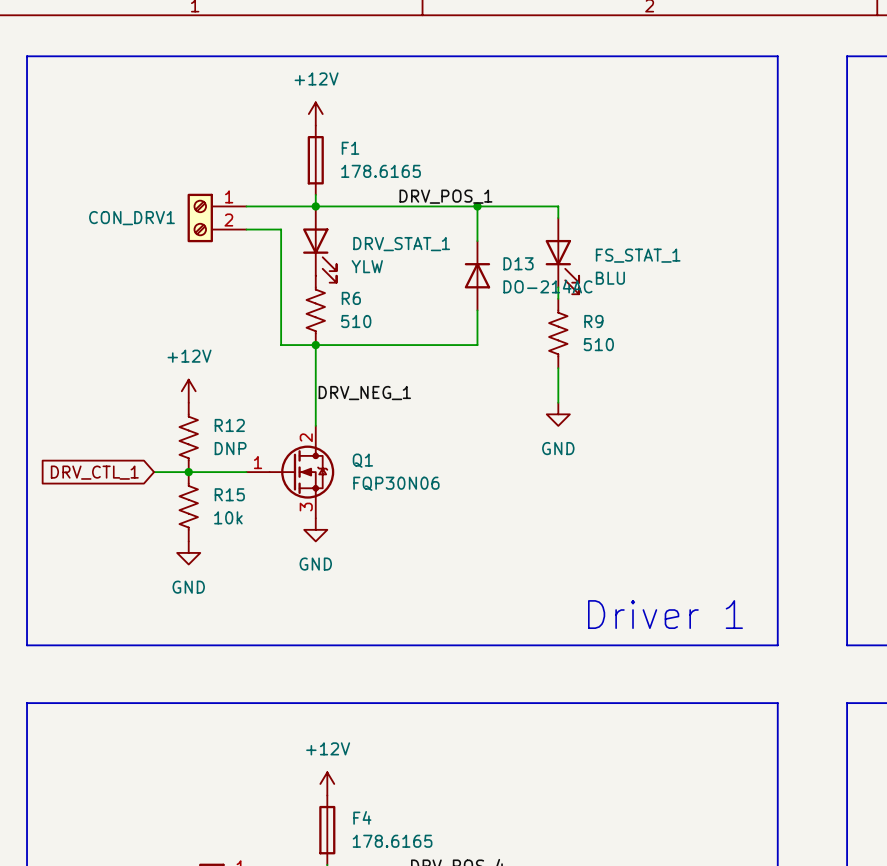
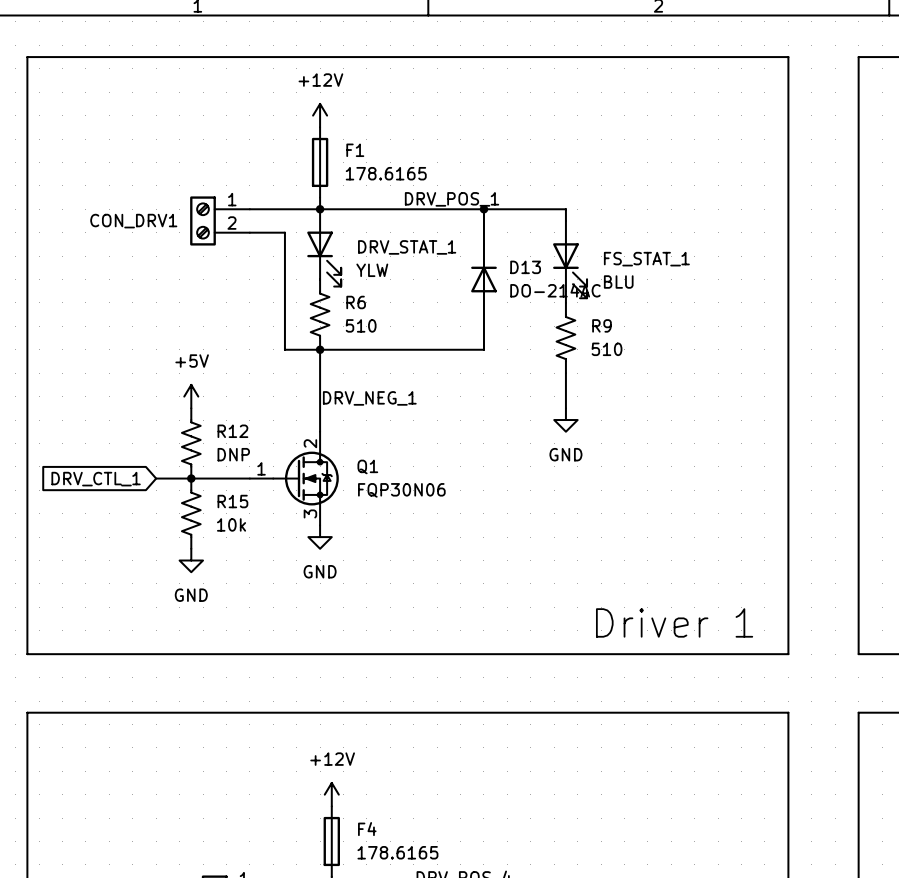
power symbol: +12V (188, 391) -> +5V (191, 396)

